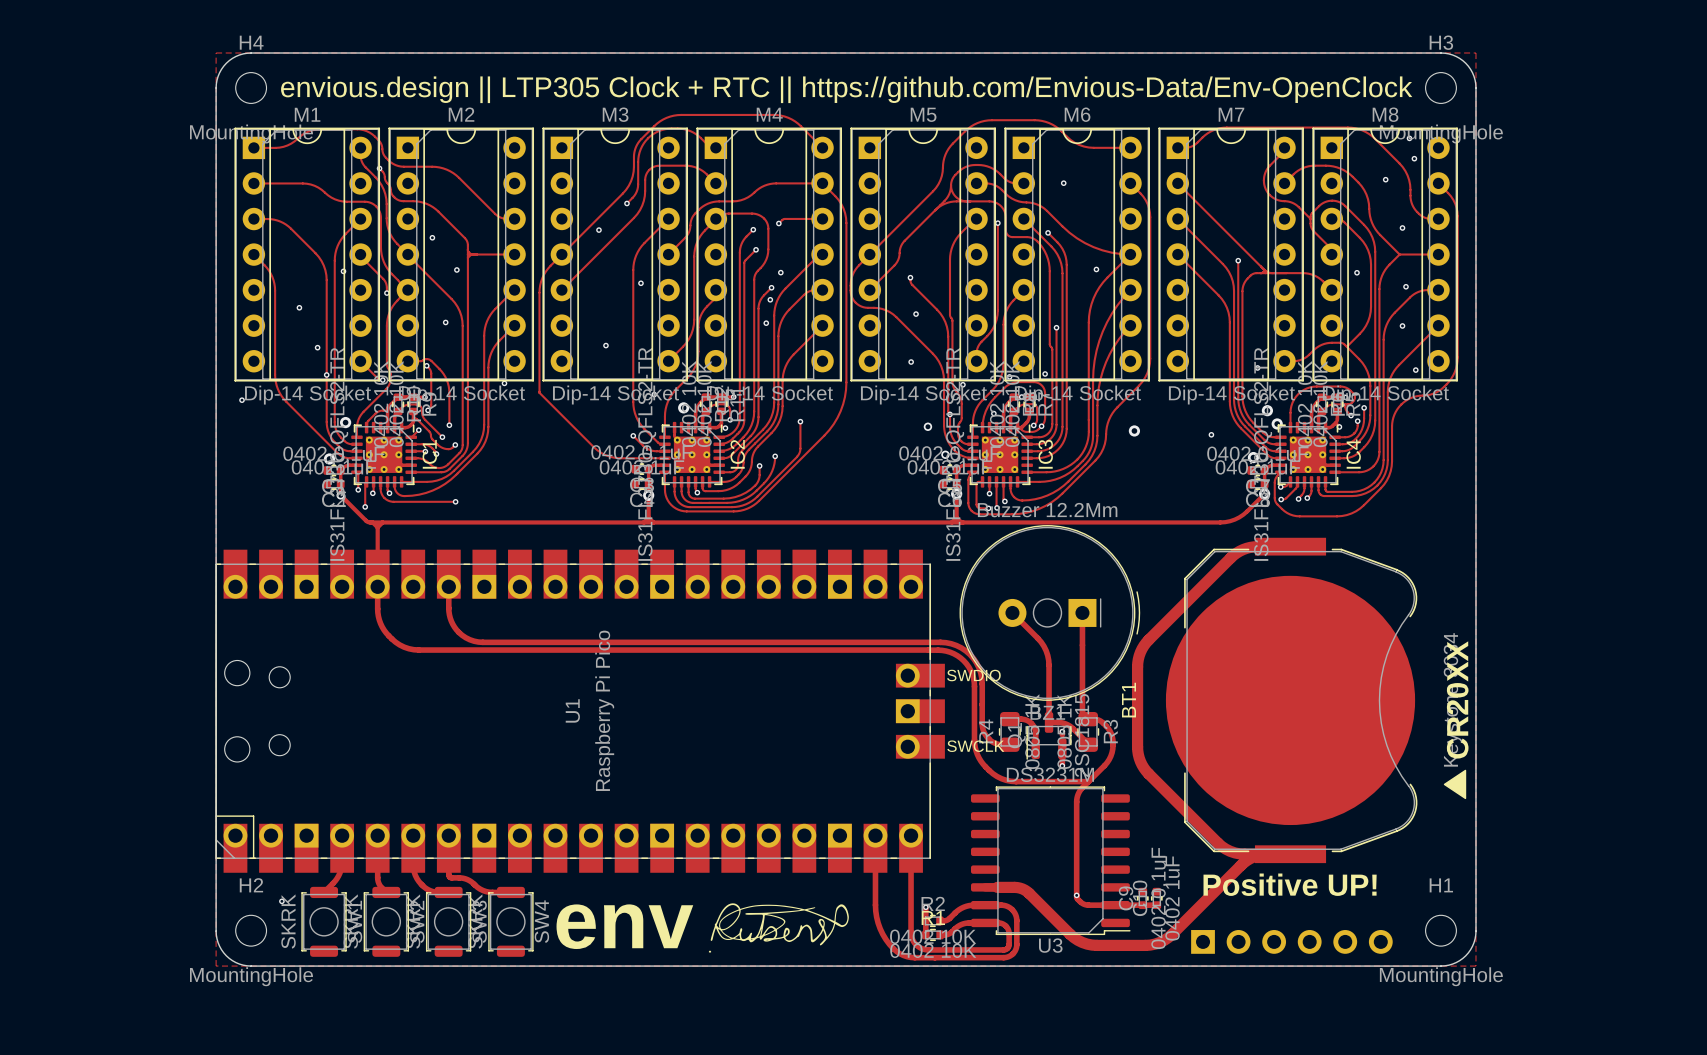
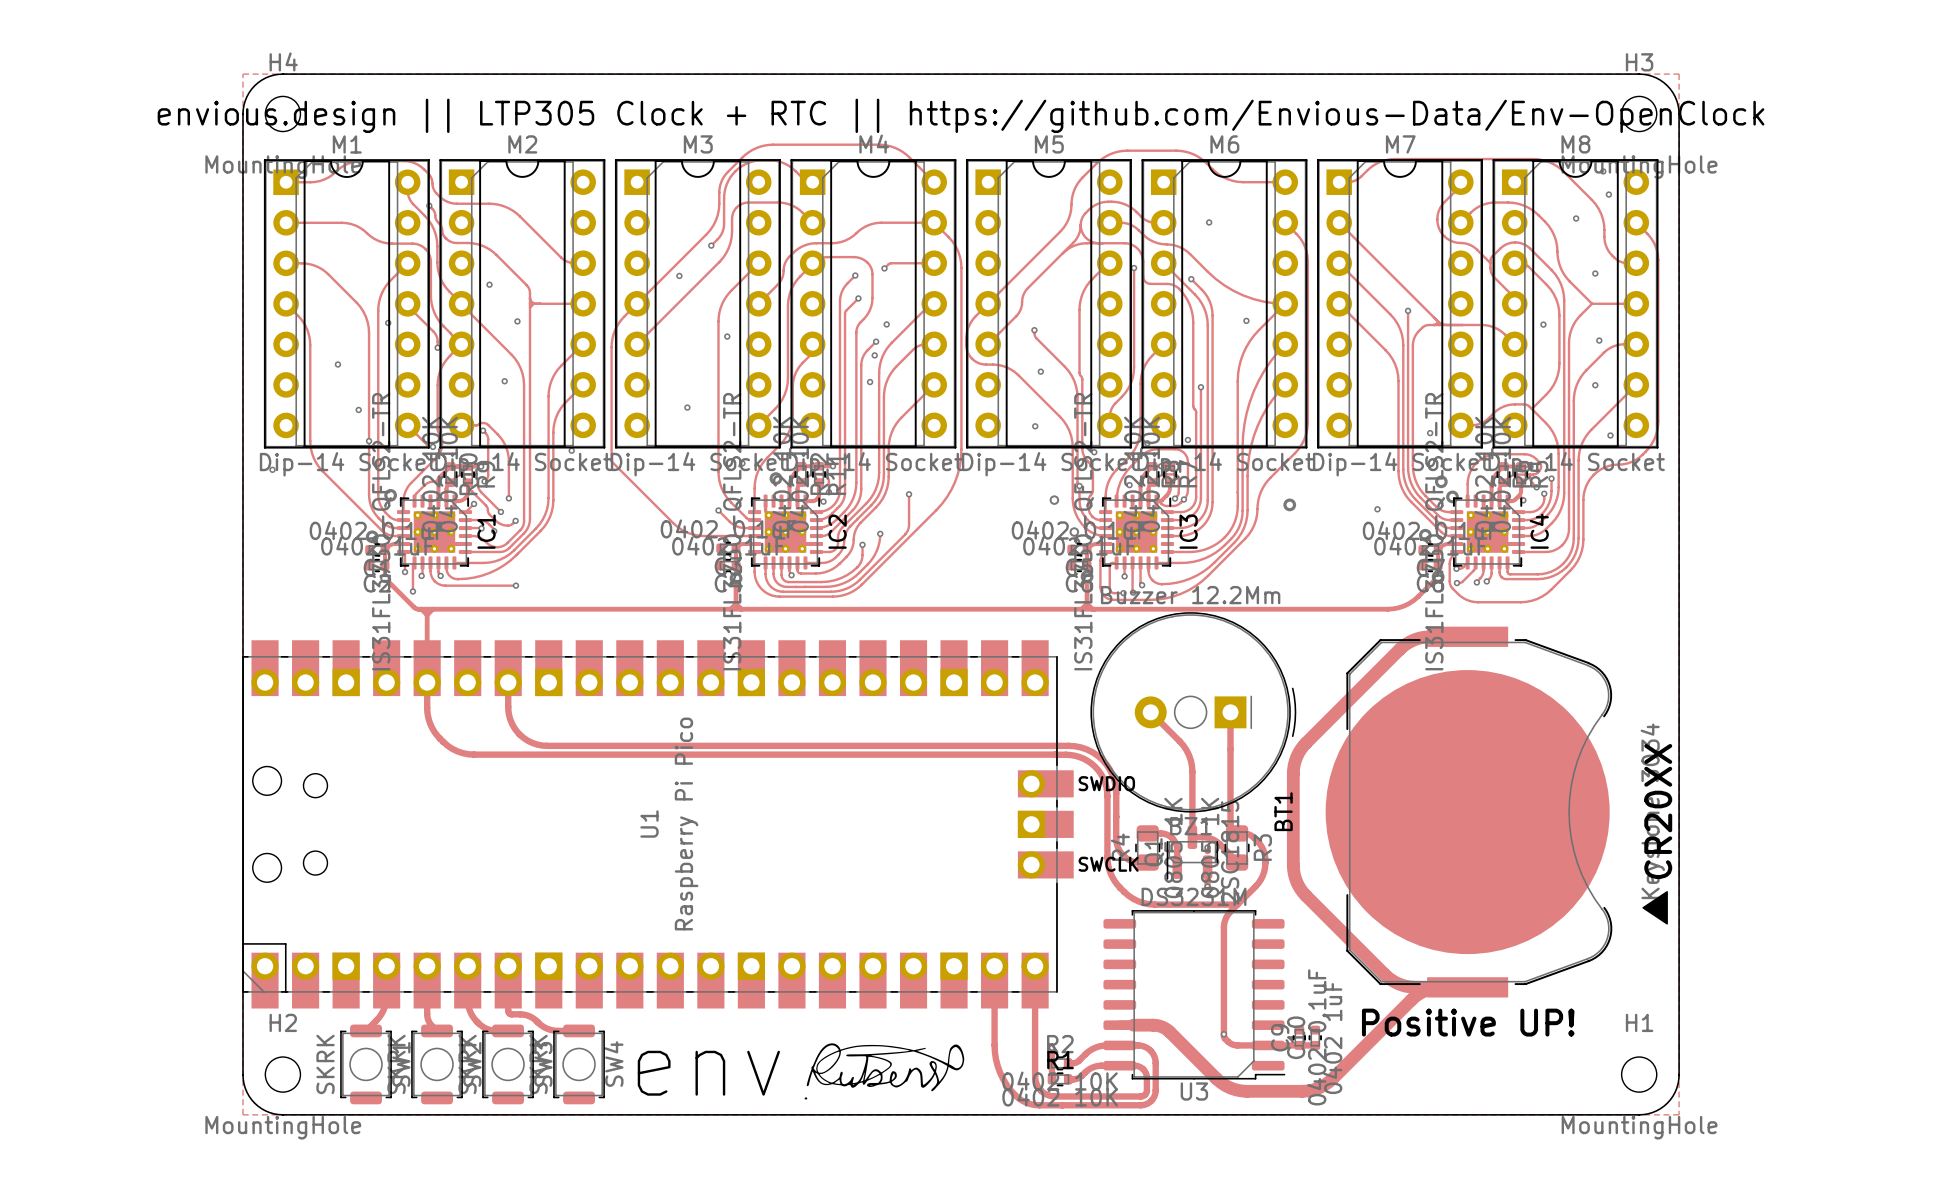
via: (281, 901) -> none
part: (1291, 941) -> none

